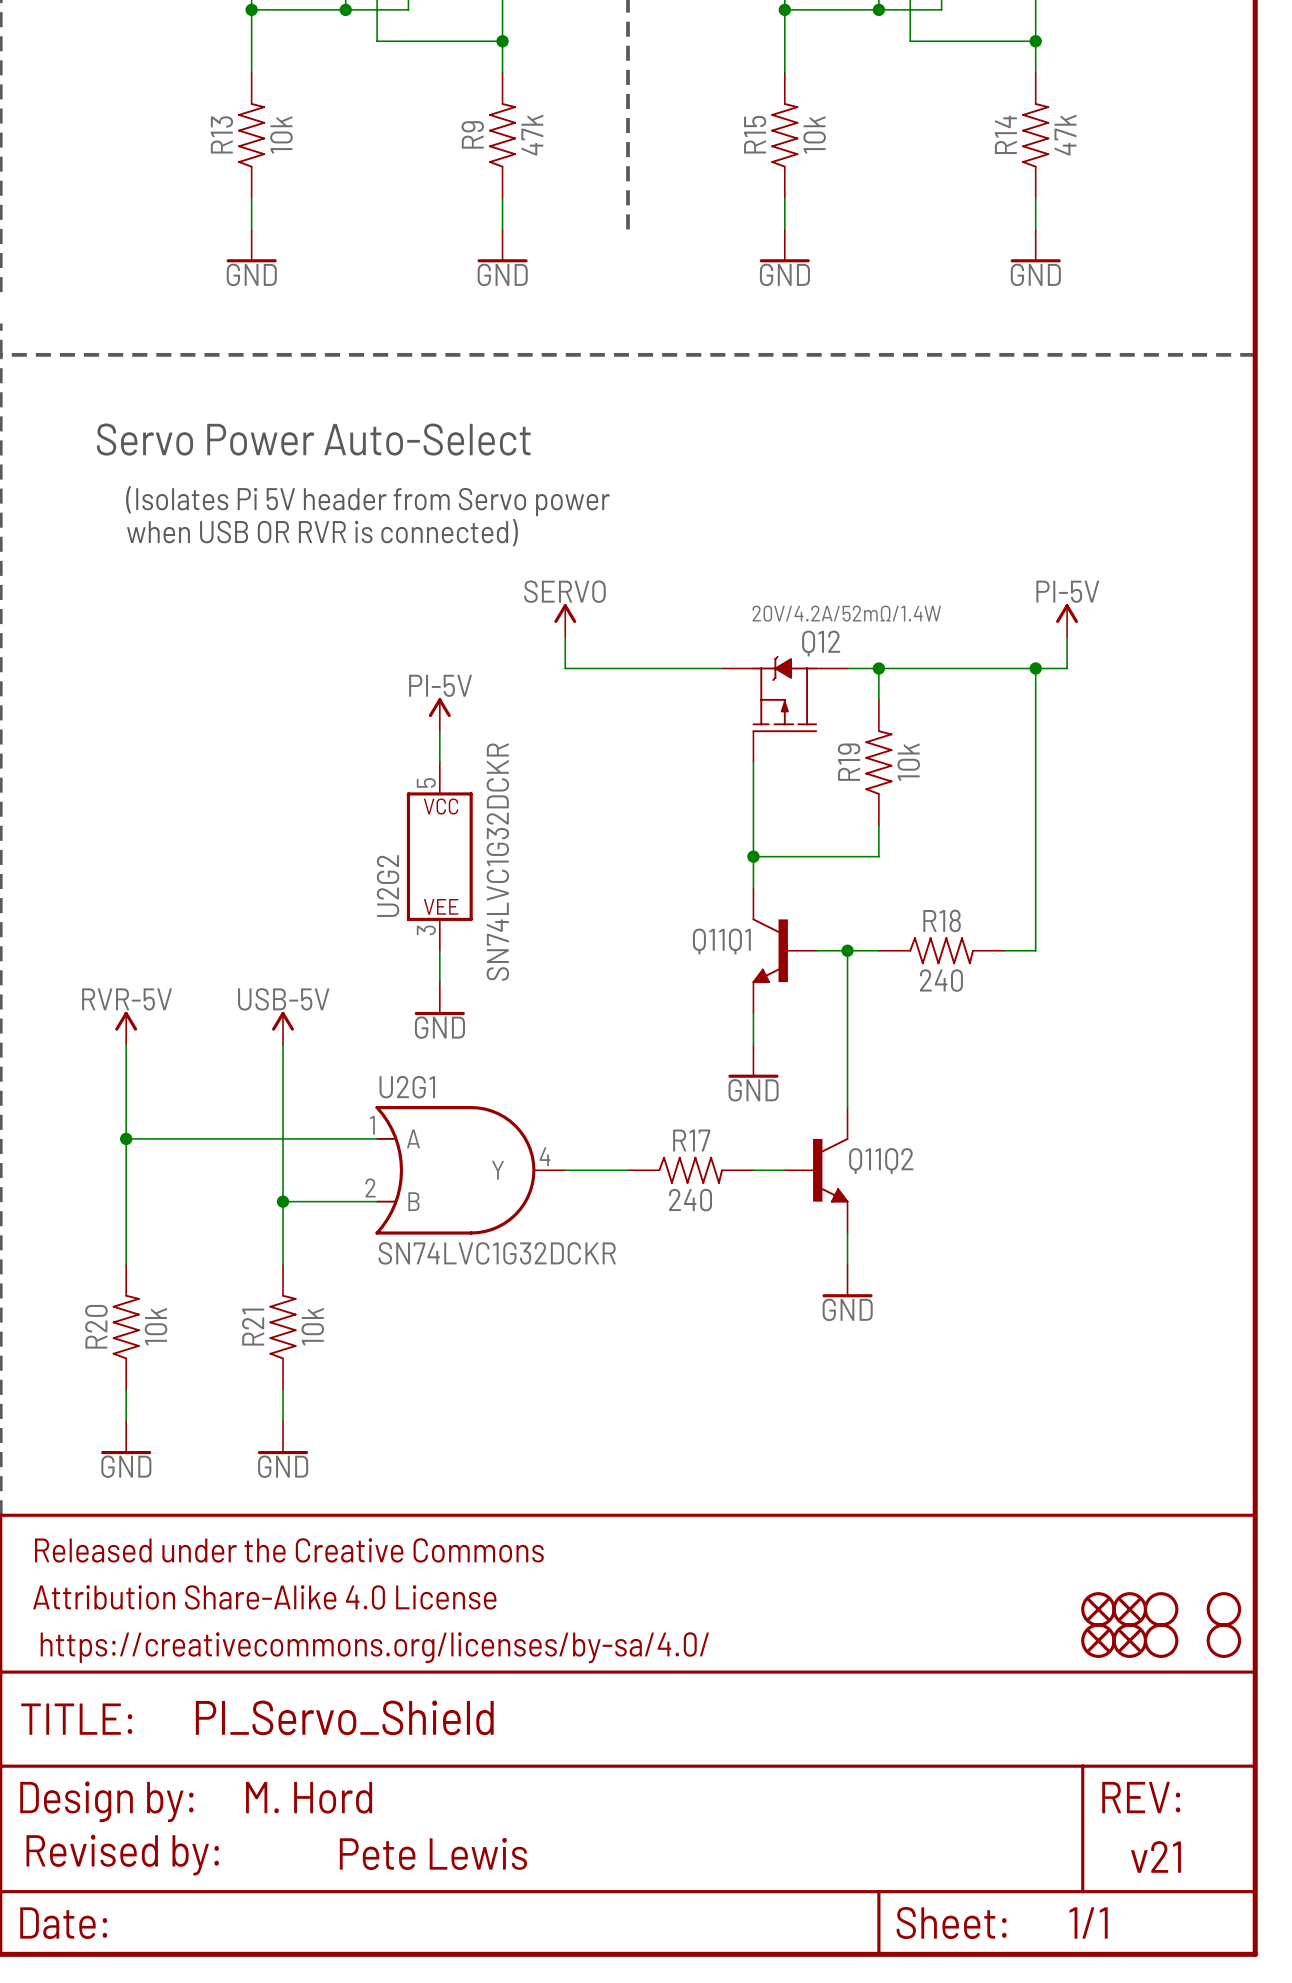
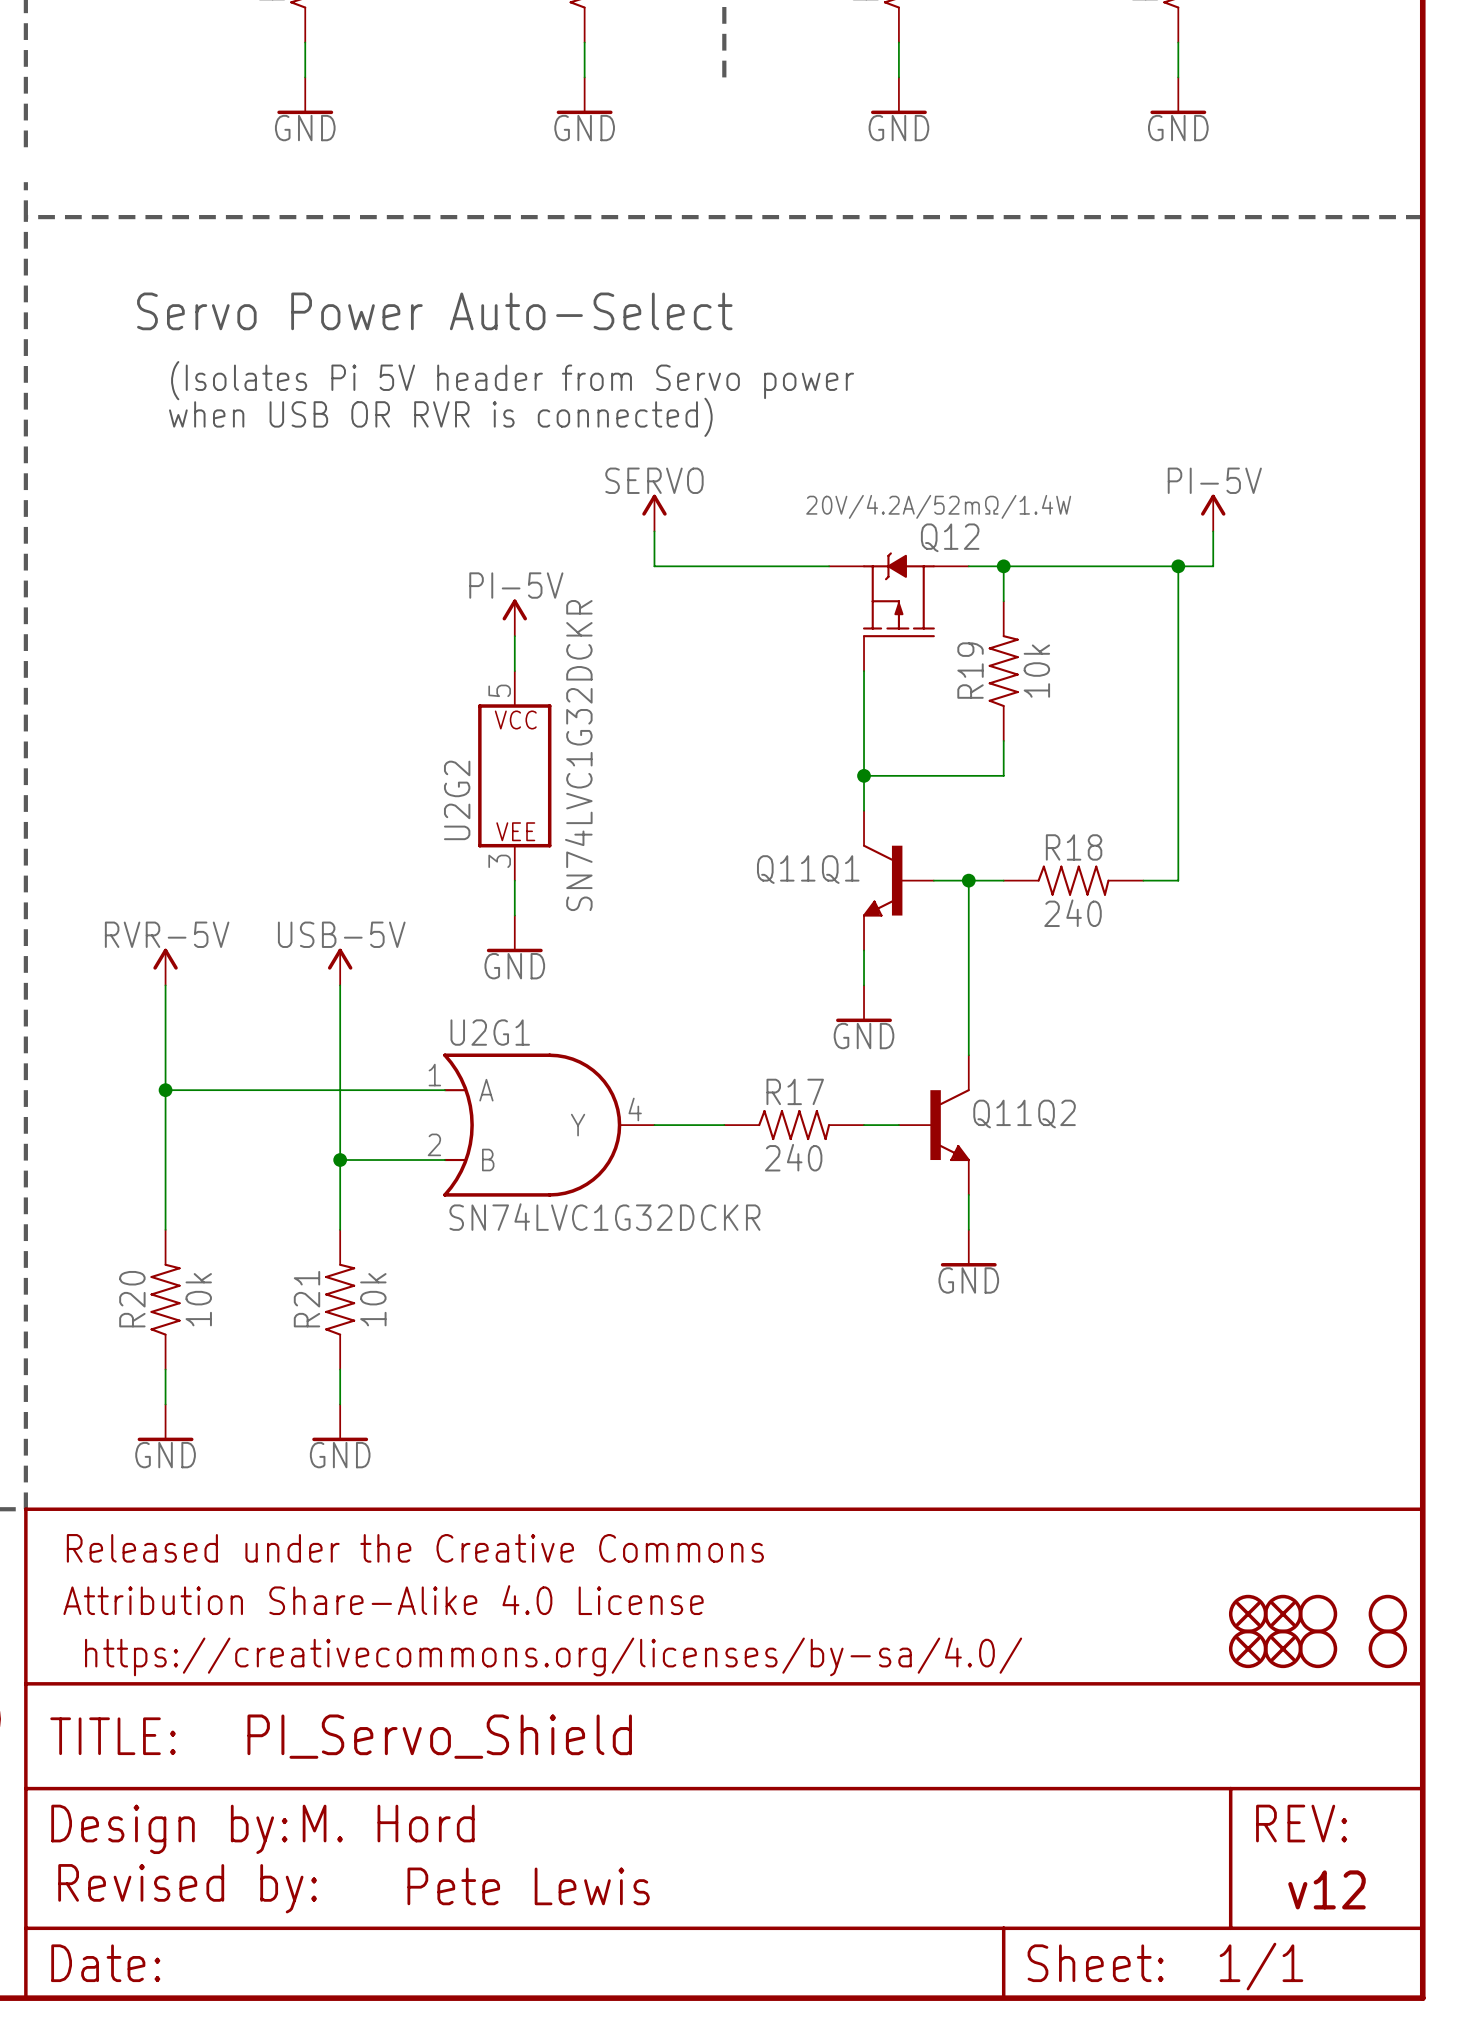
text: v21 (1156, 1856) -> v12 (1326, 1889)

